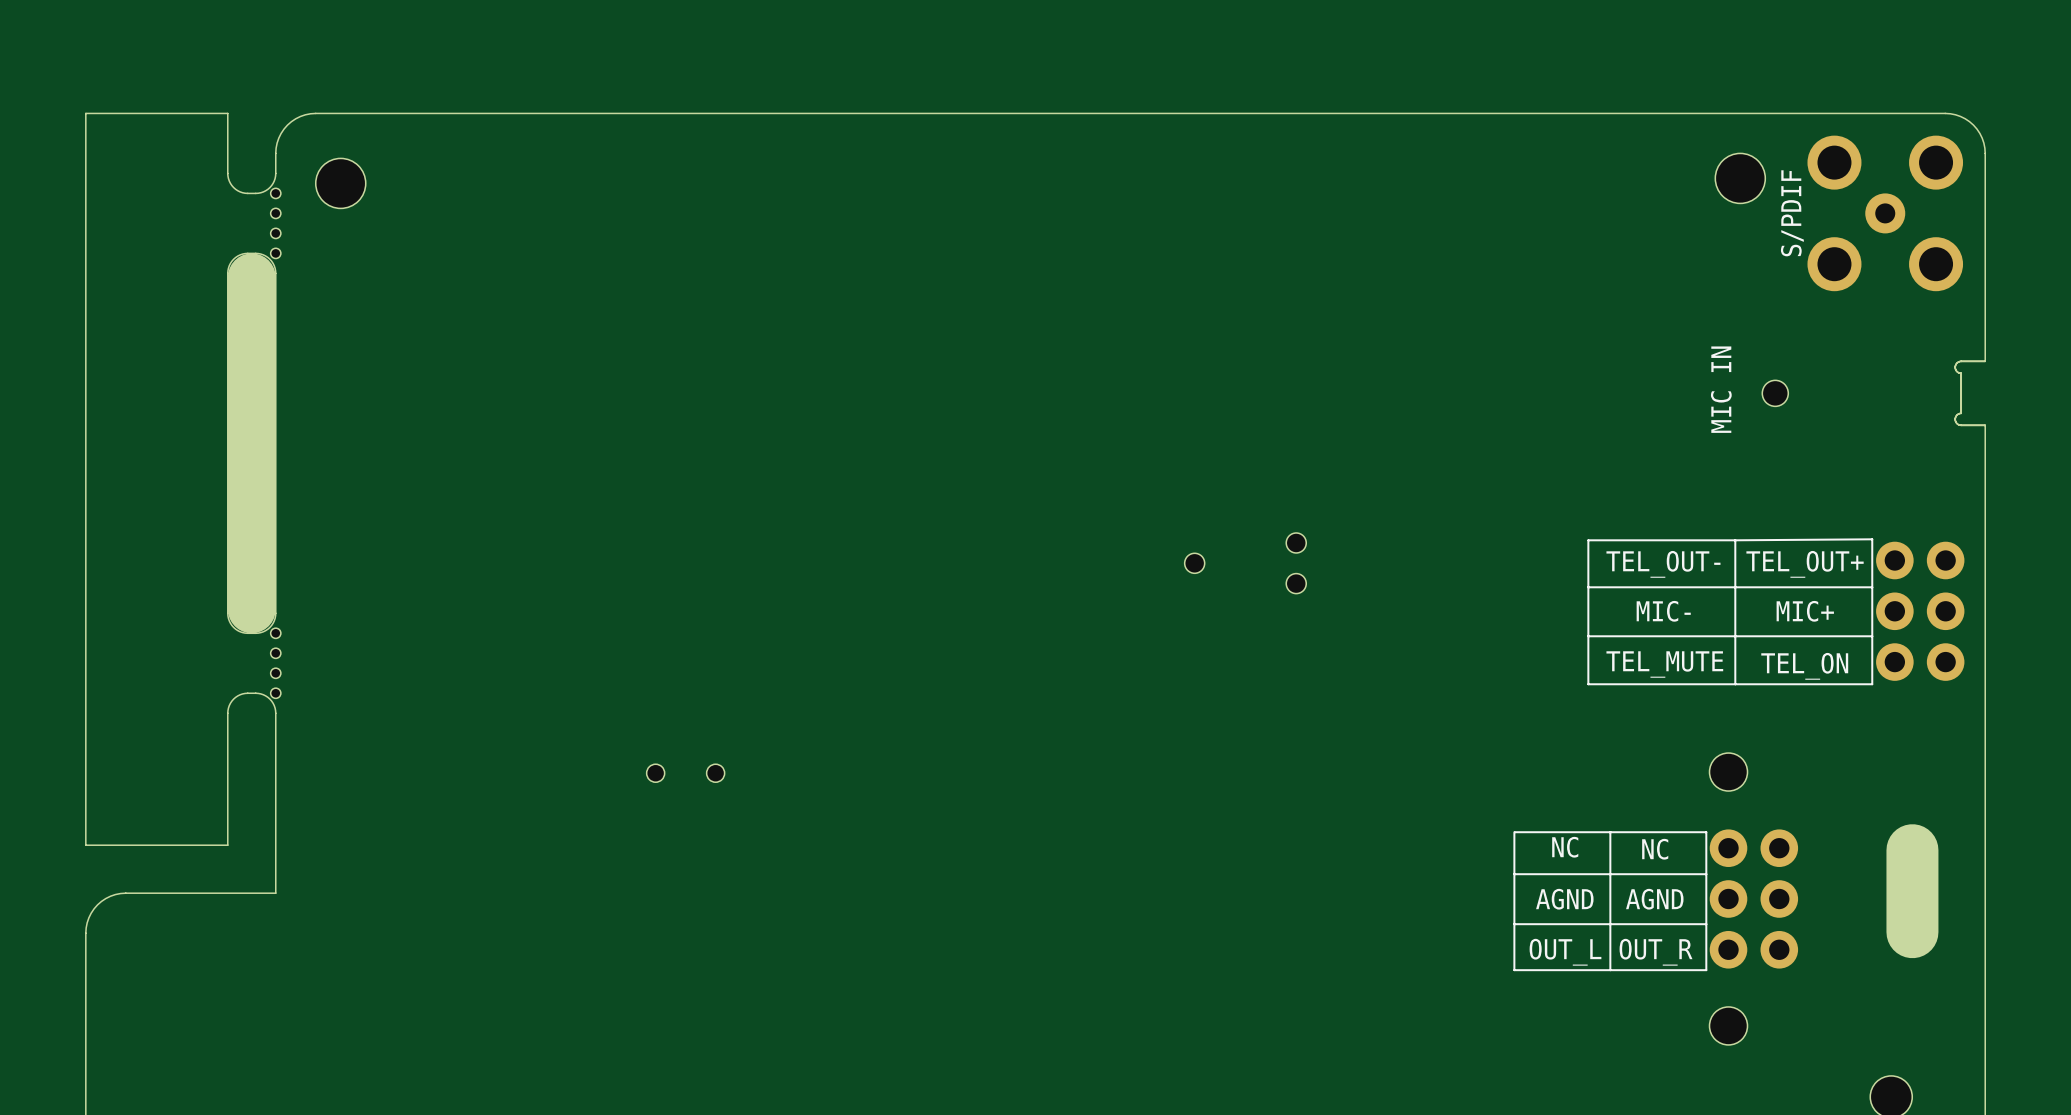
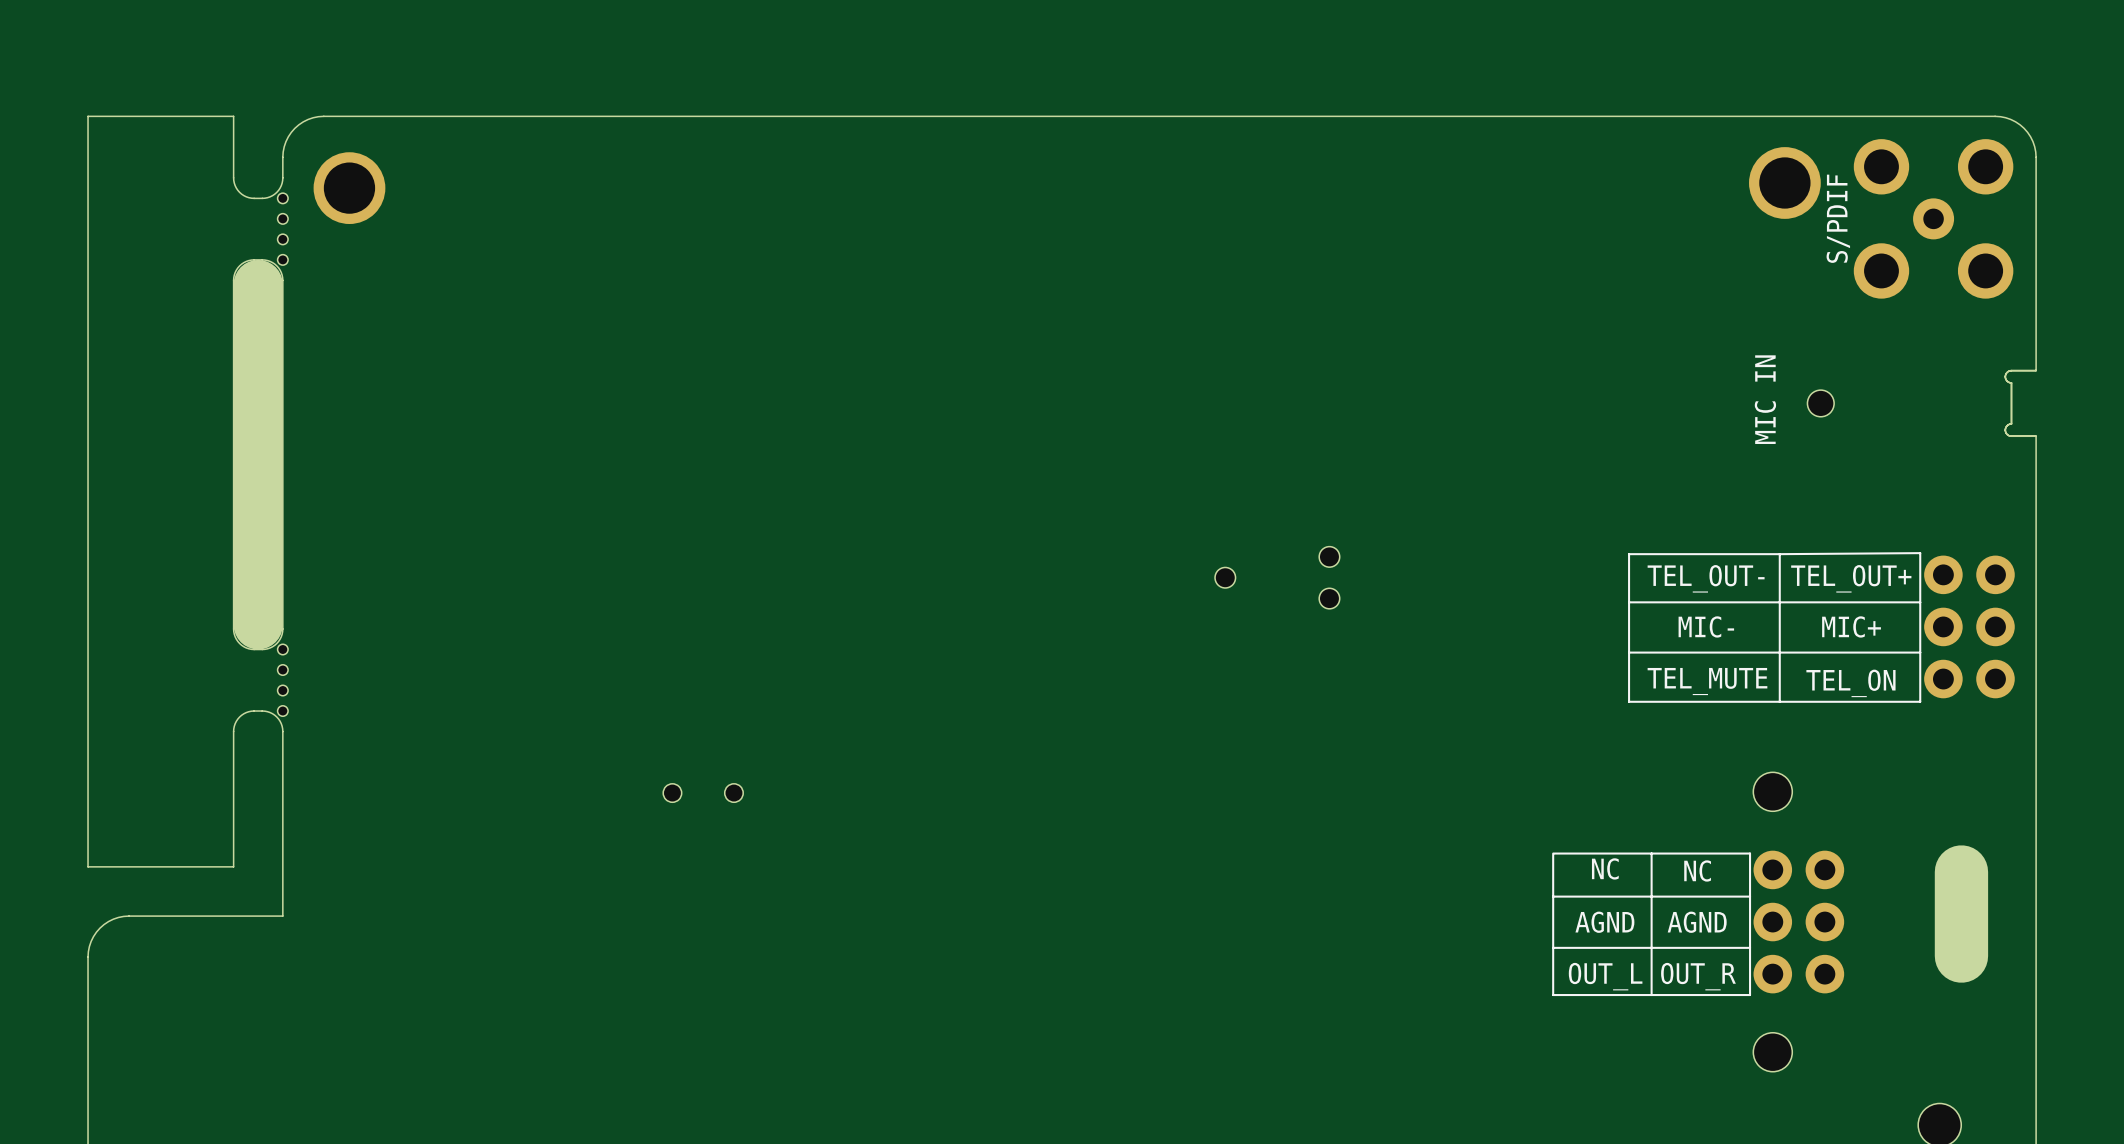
part footprint: [1715, 153, 1766, 204] -> [1749, 147, 1821, 219]
part footprint: [315, 158, 366, 209] -> [313, 152, 386, 225]

